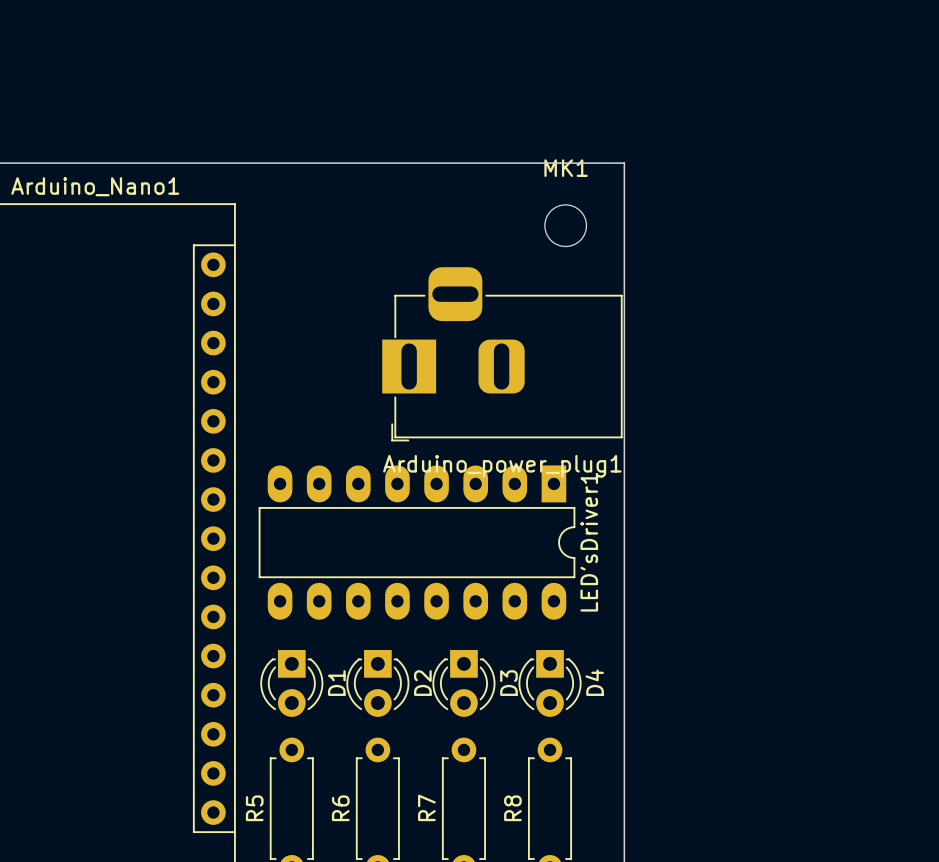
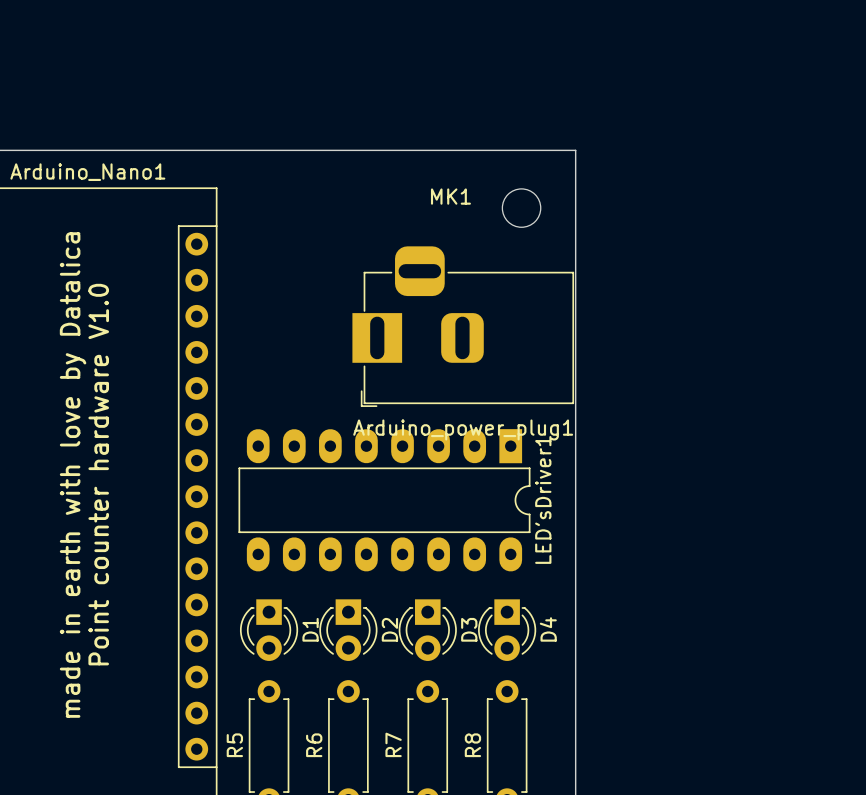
MK1 name position: MK1 (566, 168) -> MK1 (450, 196)
text: none -> Point counter hardware V1.0 (98, 474)
text: none -> made in earth with love by Datalica (73, 475)

